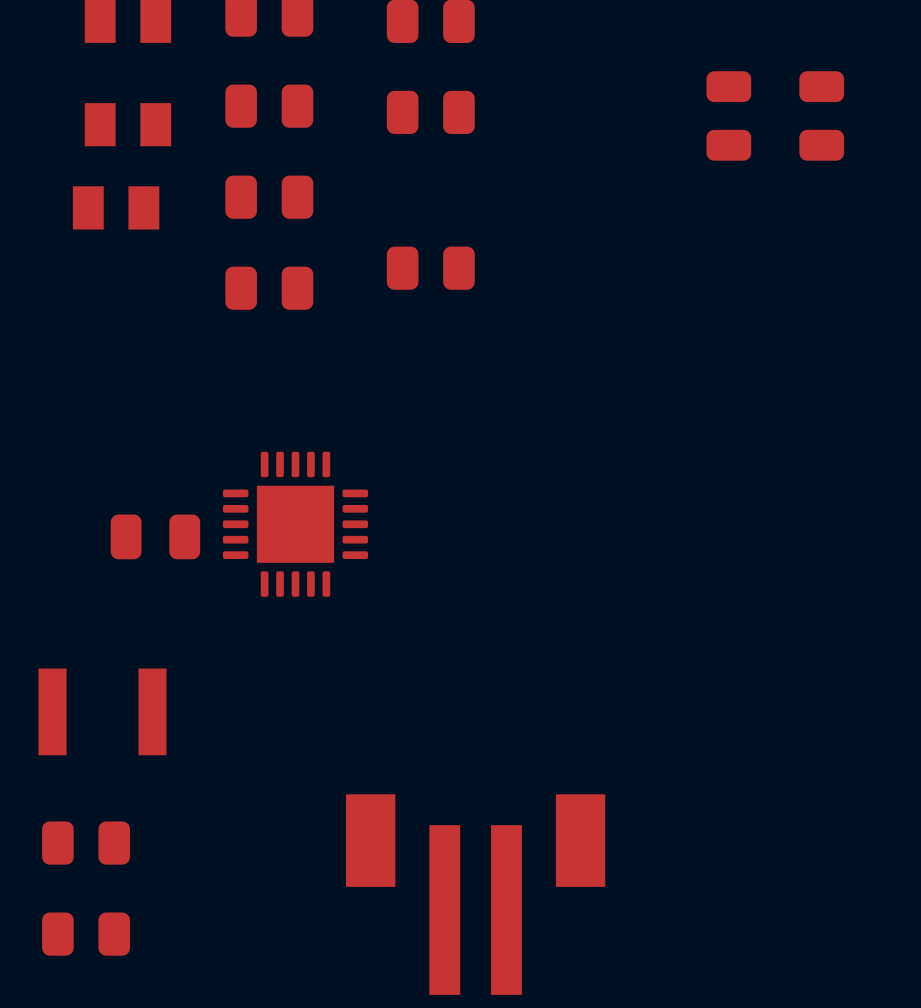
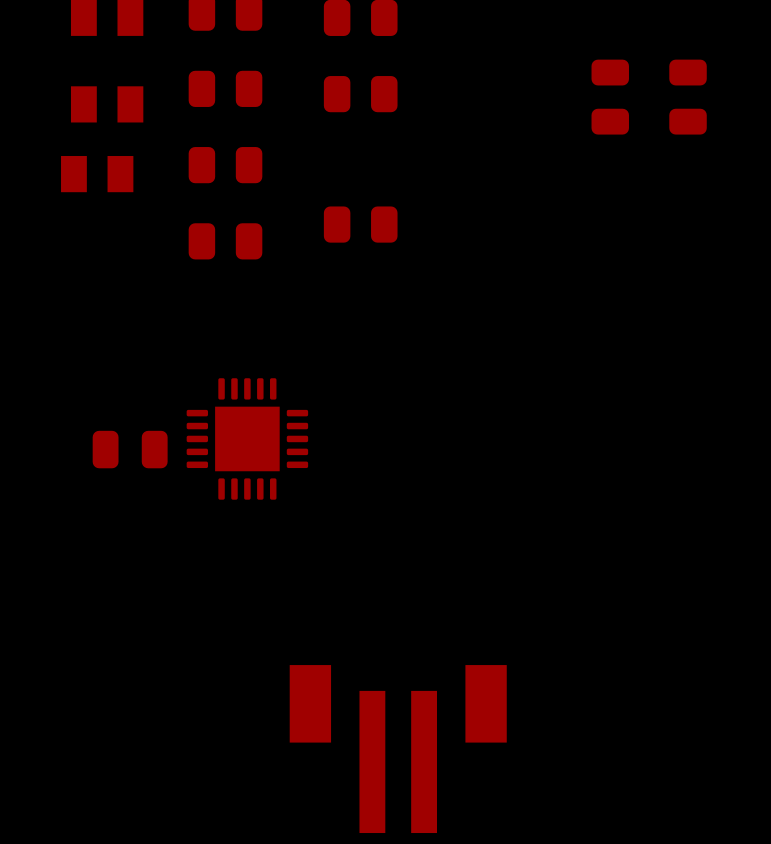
part: (102, 711) -> none
part: (86, 843) -> none
part: (86, 934) -> none

